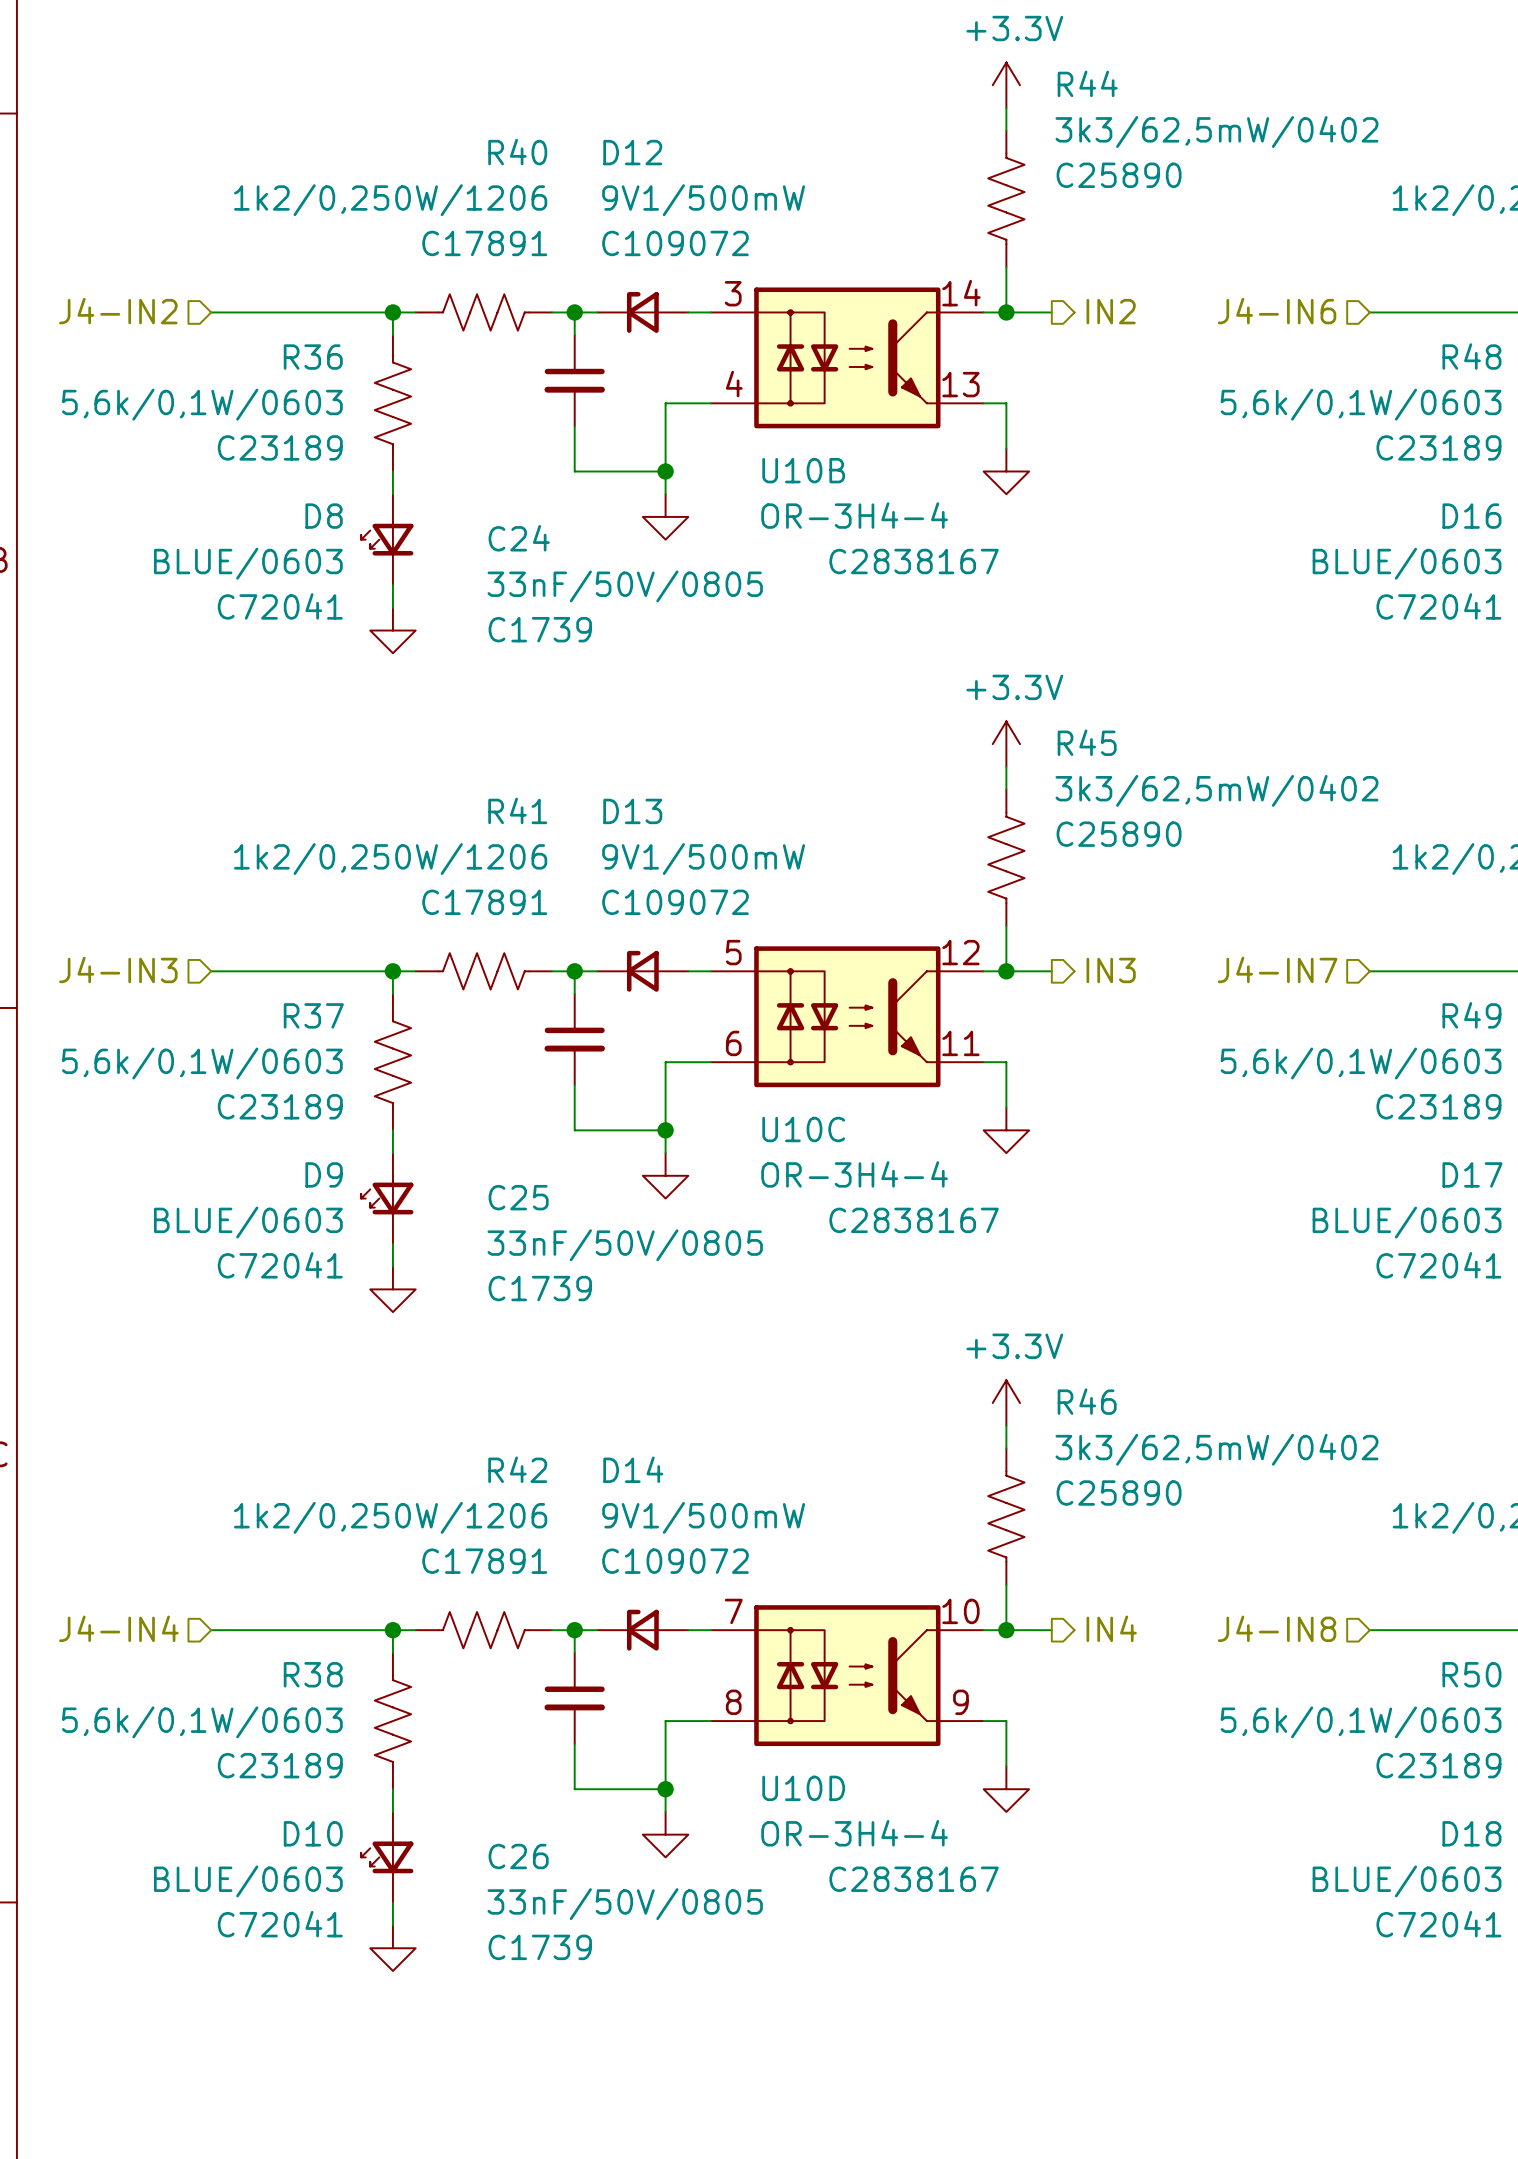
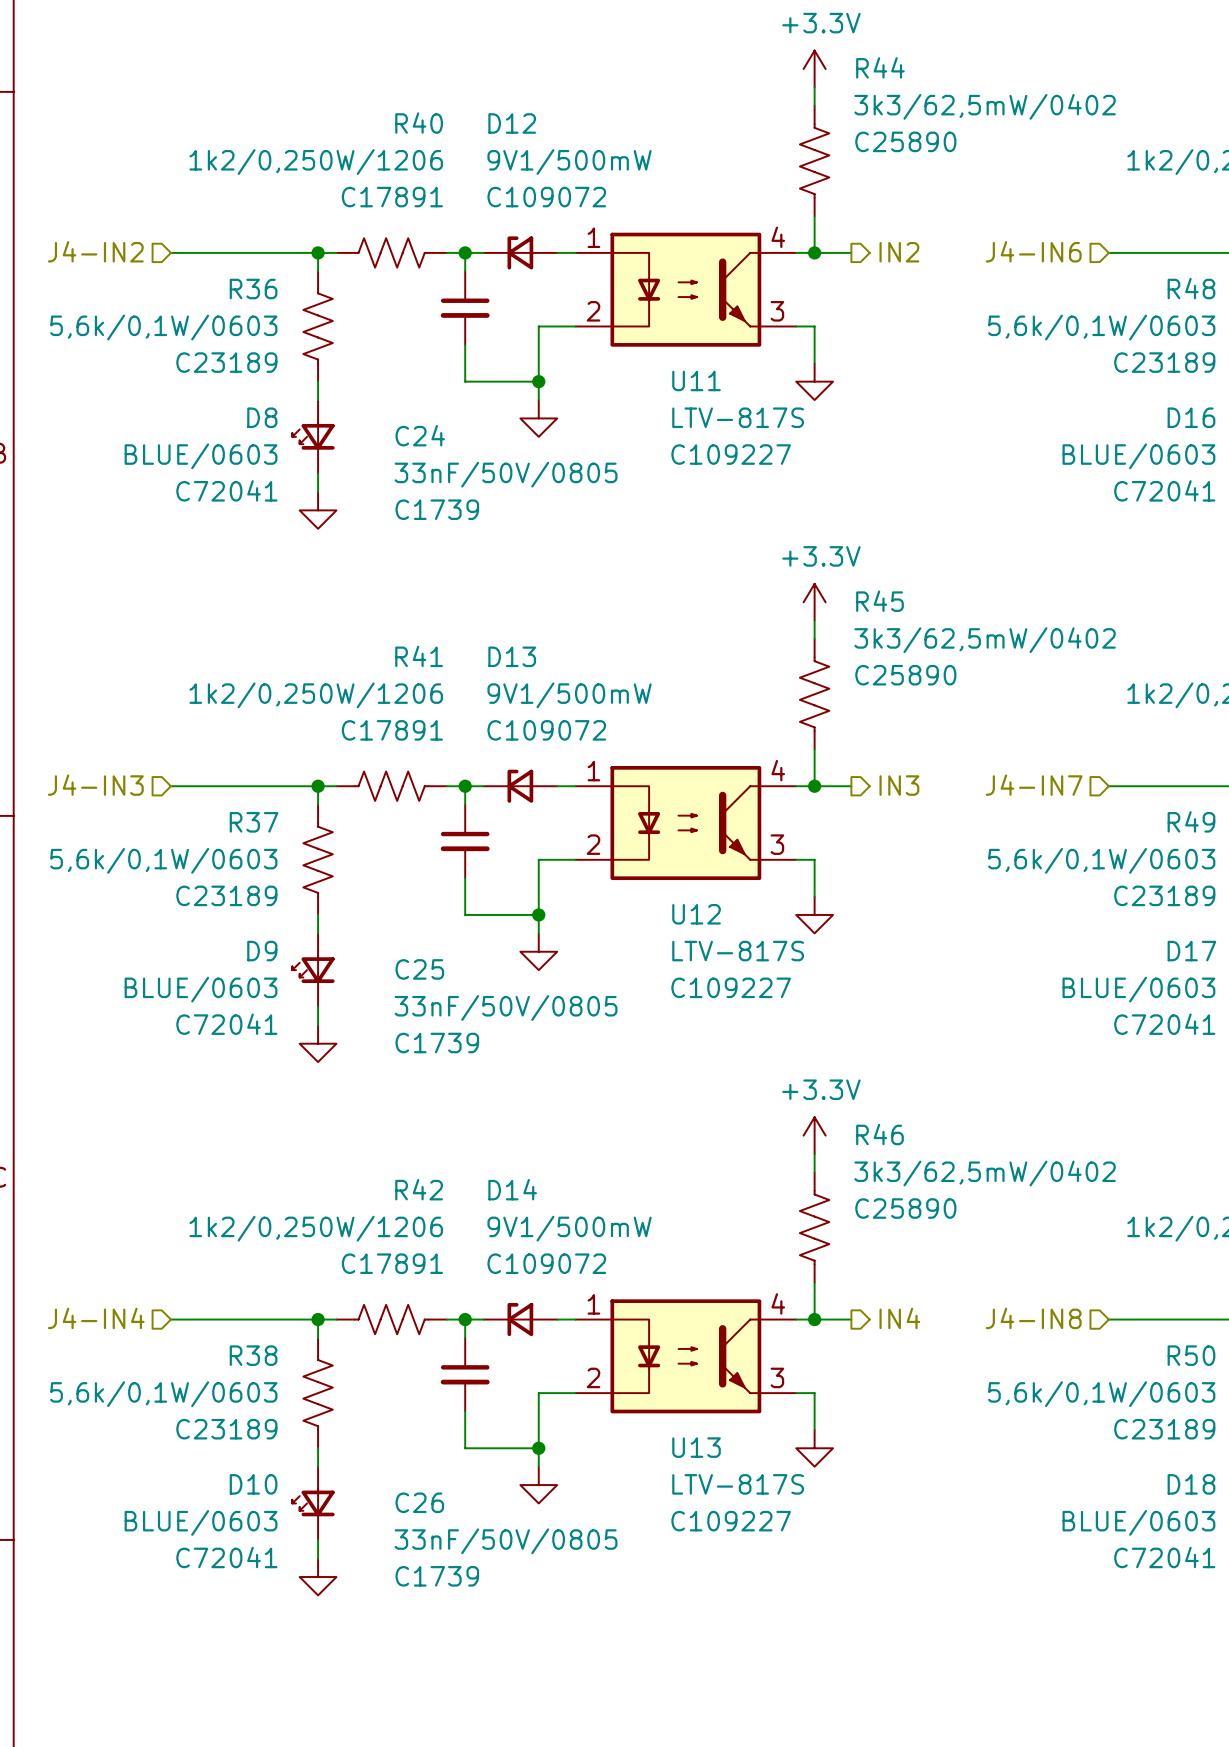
U10B: OR-3H4-4 (847, 357) -> none
U11: none -> LTV-817S (685, 289)
U10C: OR-3H4-4 (847, 1016) -> none
U12: none -> LTV-817S (685, 823)
U10D: OR-3H4-4 (847, 1675) -> none
U13: none -> LTV-817S (685, 1356)

